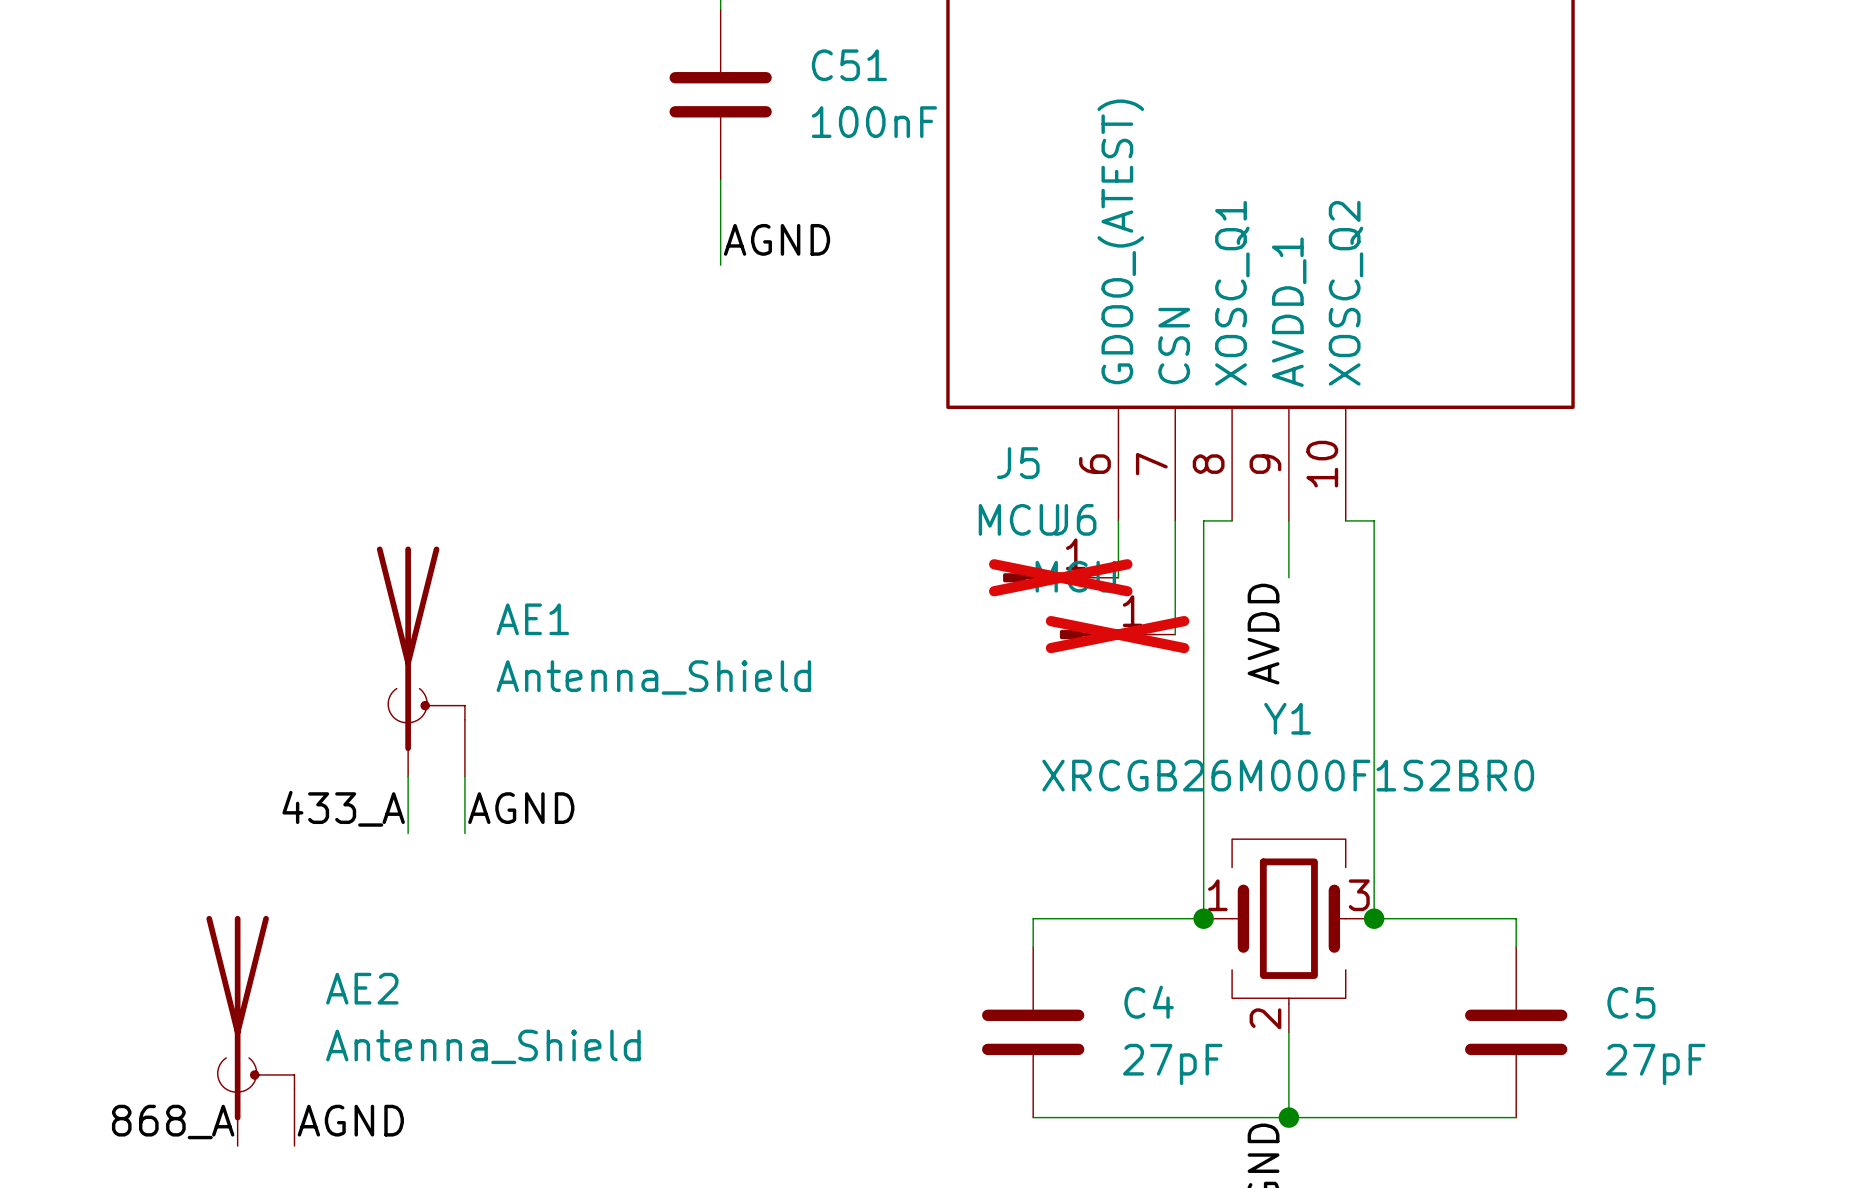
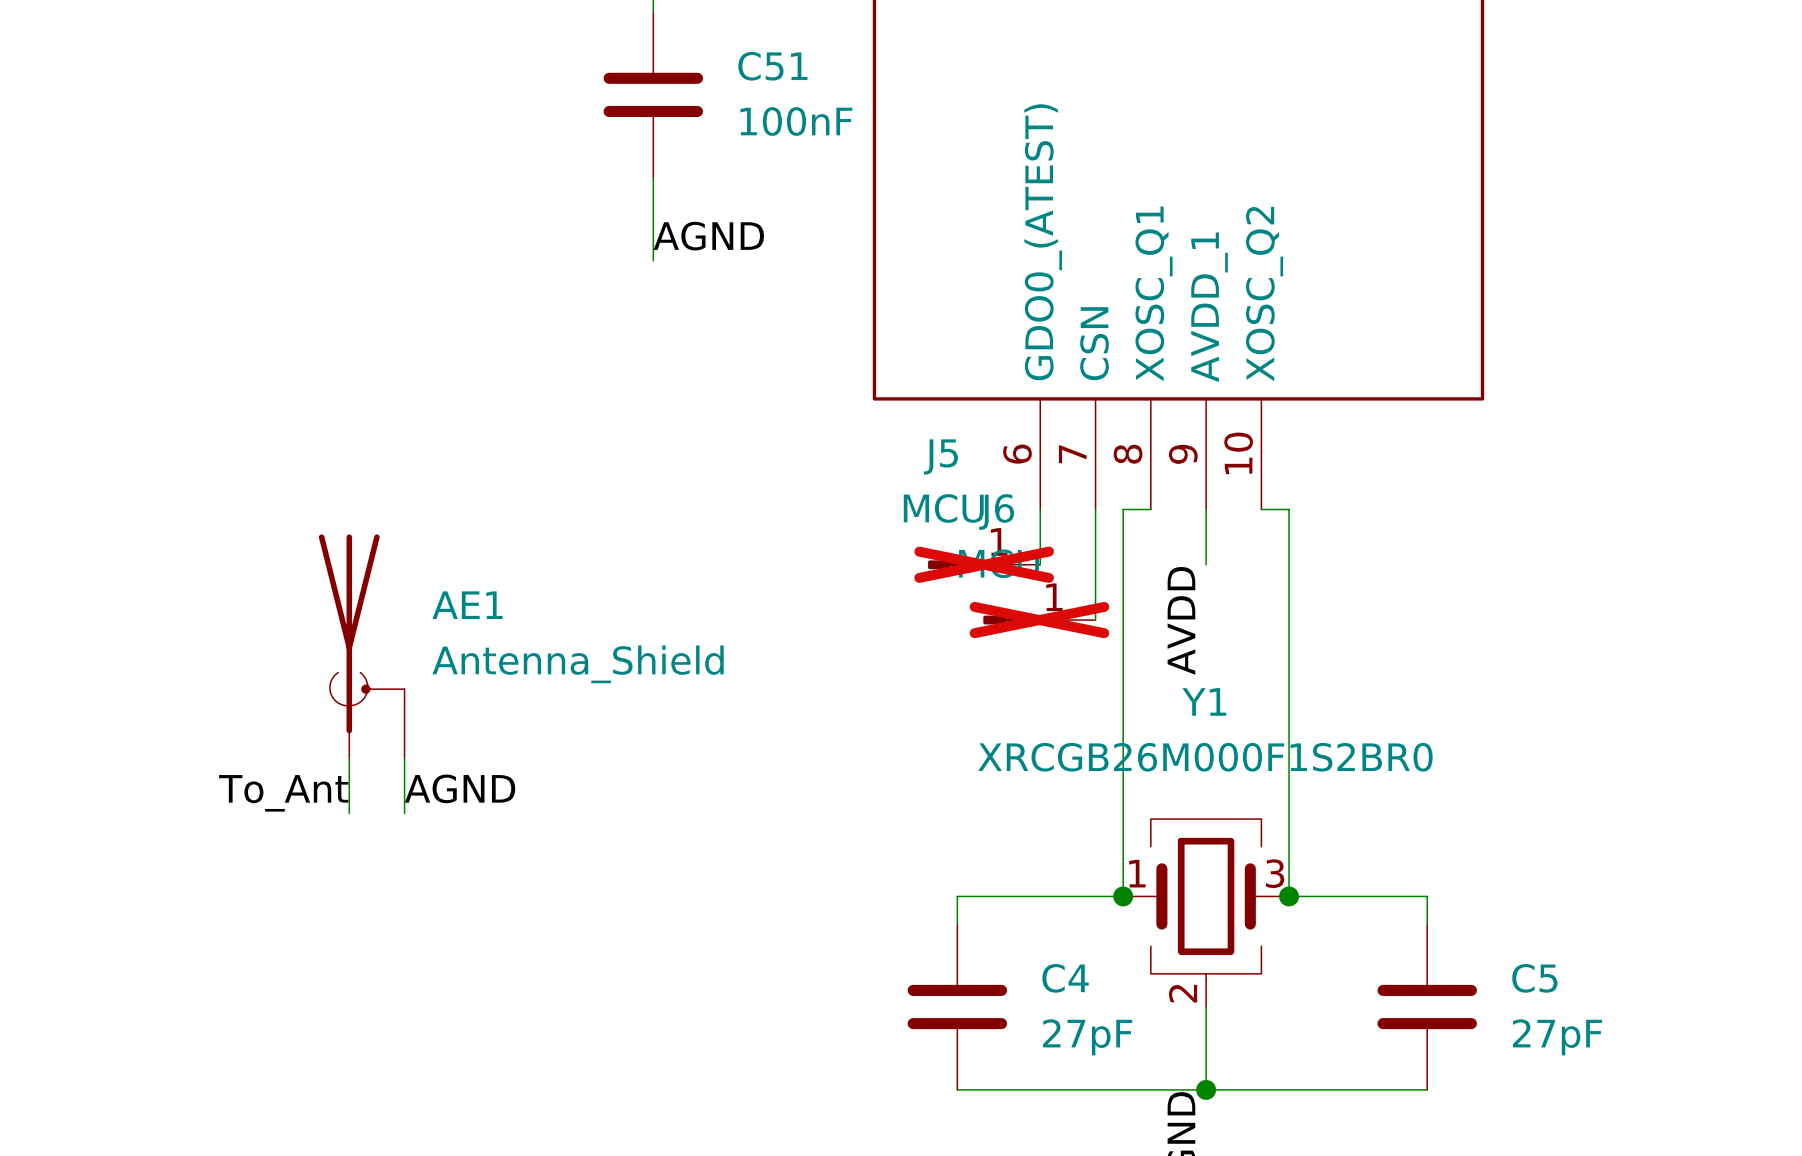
label: 433_A (343, 808) -> To_Ant (283, 793)
AE2: Antenna_Shield (250, 1030) -> none
label: AGND (350, 1120) -> none
label: 868_A (173, 1122) -> none

